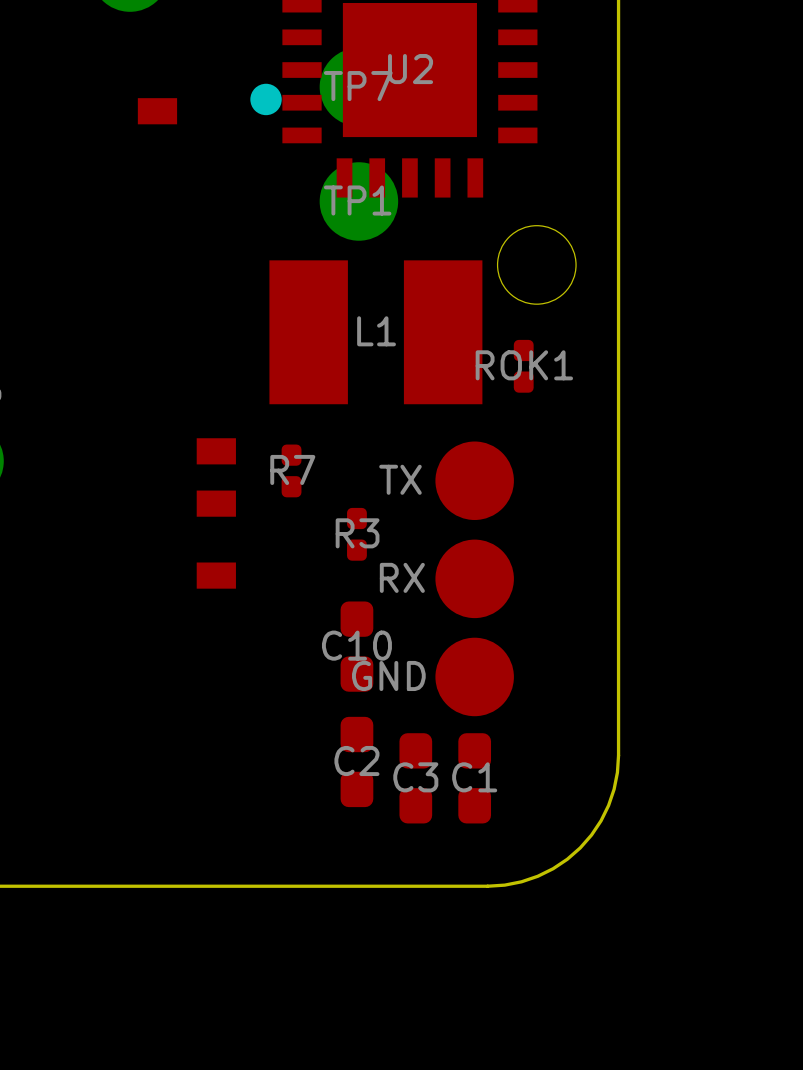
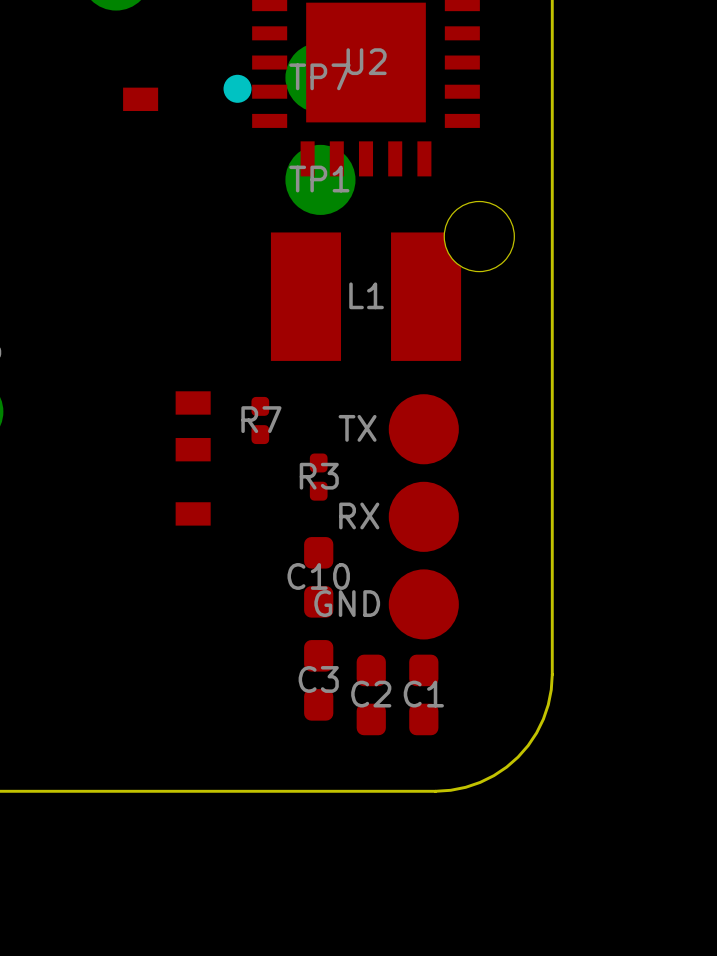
part position: (375, 332) -> (366, 296)
part: (523, 366) -> none
part text: C2 (356, 761) -> C3 (318, 679)
part text: C3 (415, 777) -> C2 (371, 694)

